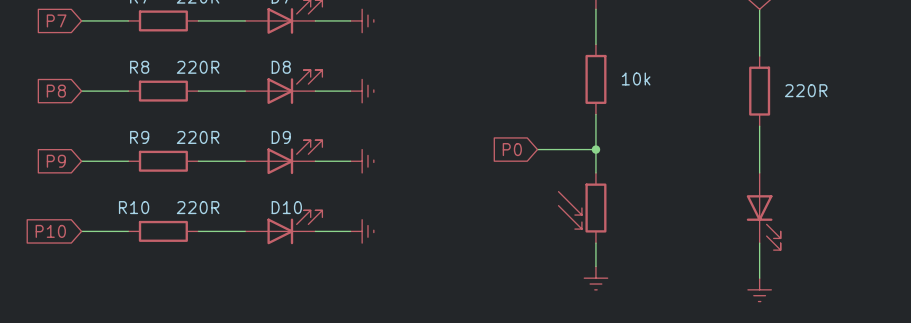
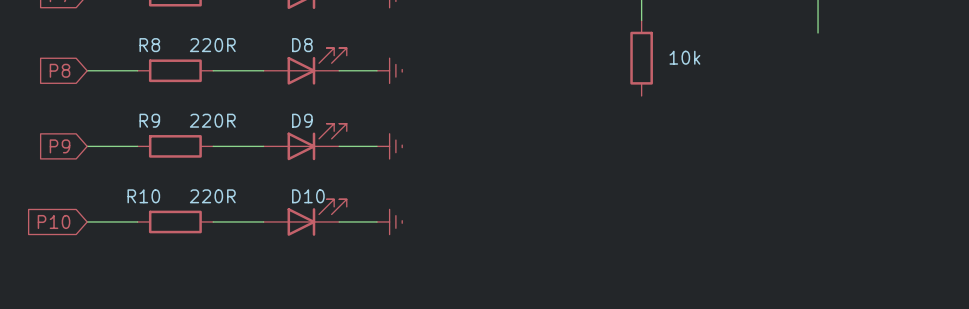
part: 220R (759, 91) -> none
wire: (595, 114) (595, 172) -> none
wire: (759, 126) (759, 172) -> none
global label: P0 (512, 149) -> none
wire: (537, 149) (595, 149) -> none
junction: (595, 149) -> none
part: (582, 208) -> none
part: (763, 211) -> none
wire: (595, 243) (595, 266) -> none
wire: (759, 243) (759, 278) -> none
power symbol: (595, 278) -> none
power symbol: (759, 289) -> none

